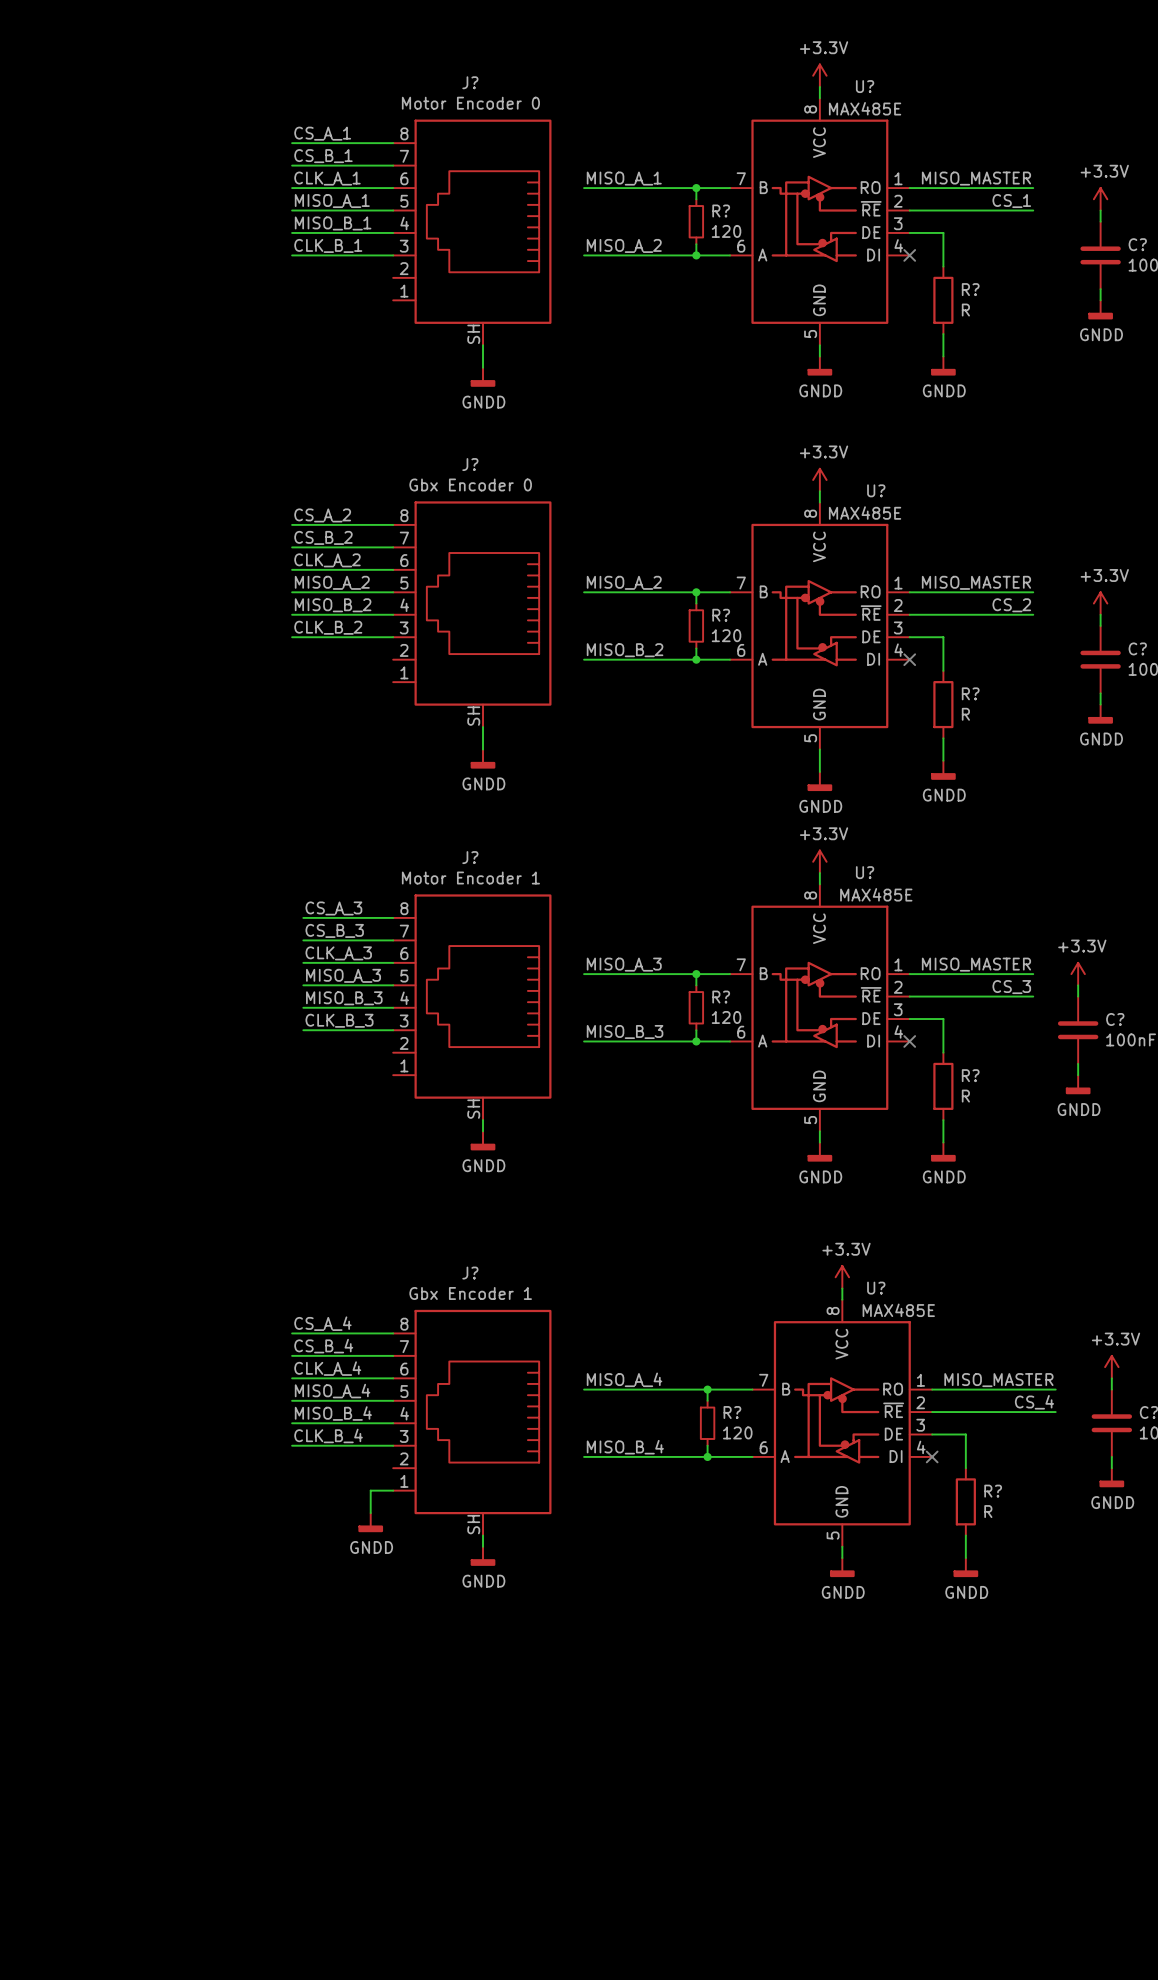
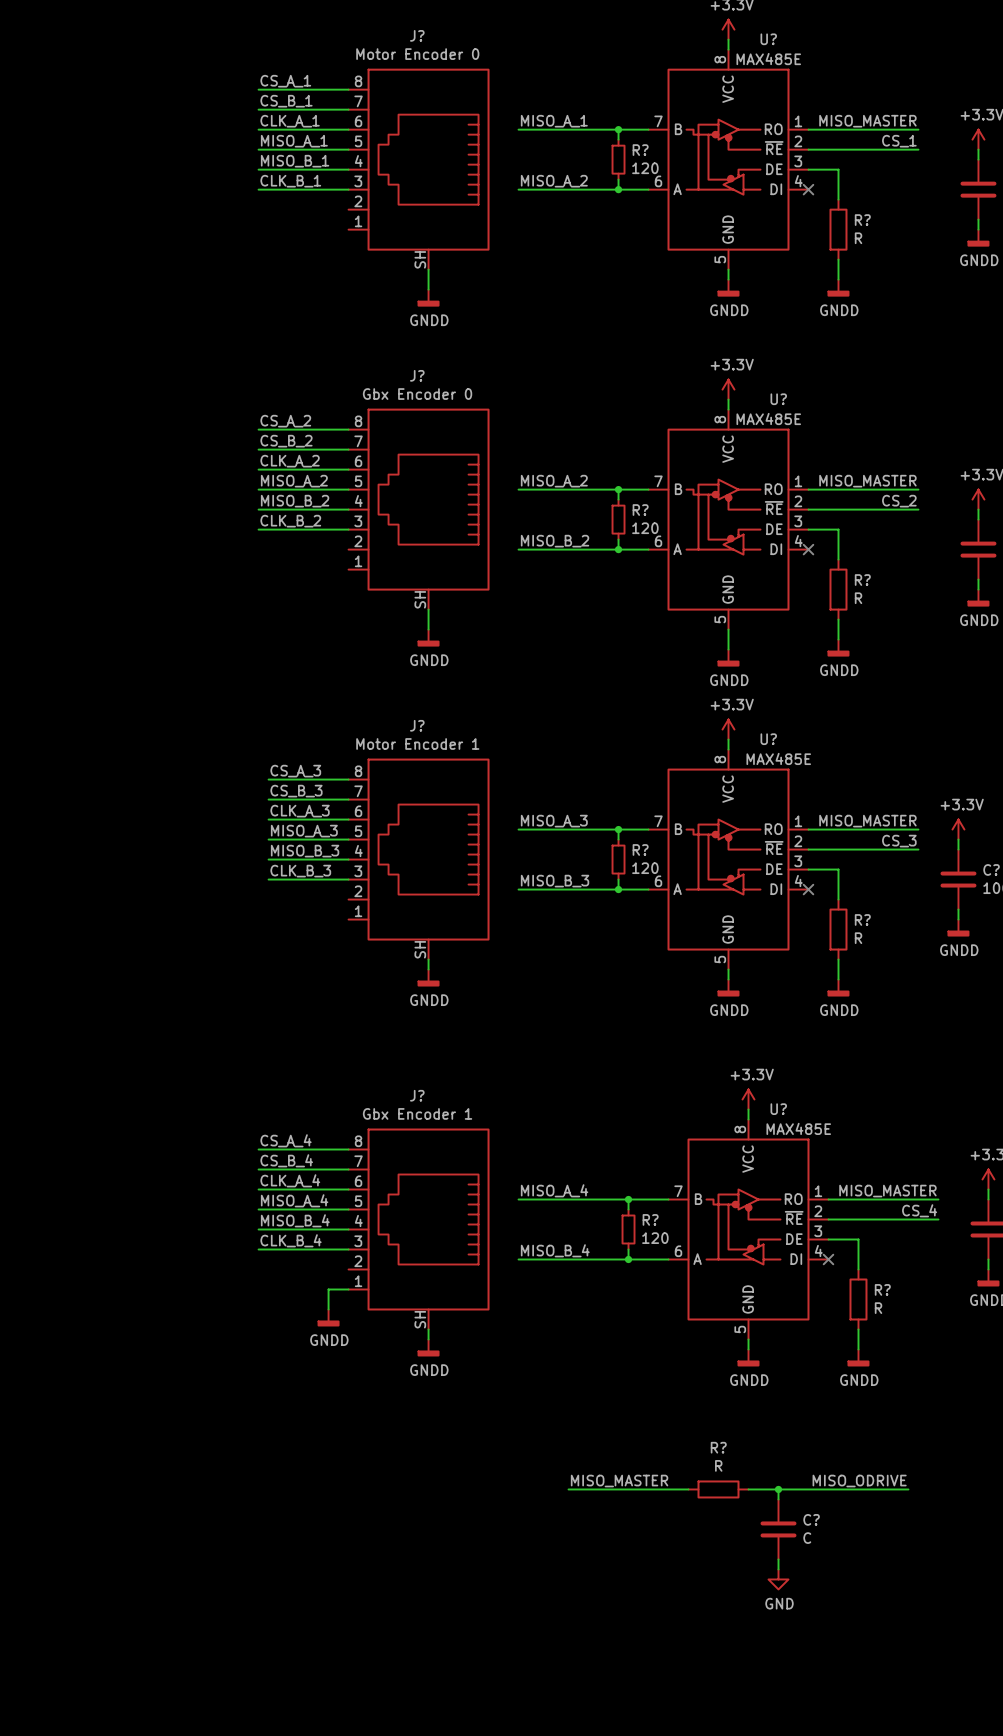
label: none -> MISO_MASTER (619, 1481)
label: none -> MISO_ODRIVE (859, 1481)
wire: none -> (568, 1489) (688, 1489)
R?: none -> R (718, 1489)
wire: none -> (748, 1489) (908, 1489)
wire: none -> (778, 1489) (778, 1499)
junction: none -> (778, 1489)
C?: none -> C (778, 1529)
wire: none -> (778, 1559) (778, 1569)
power symbol: none -> GND (778, 1579)

